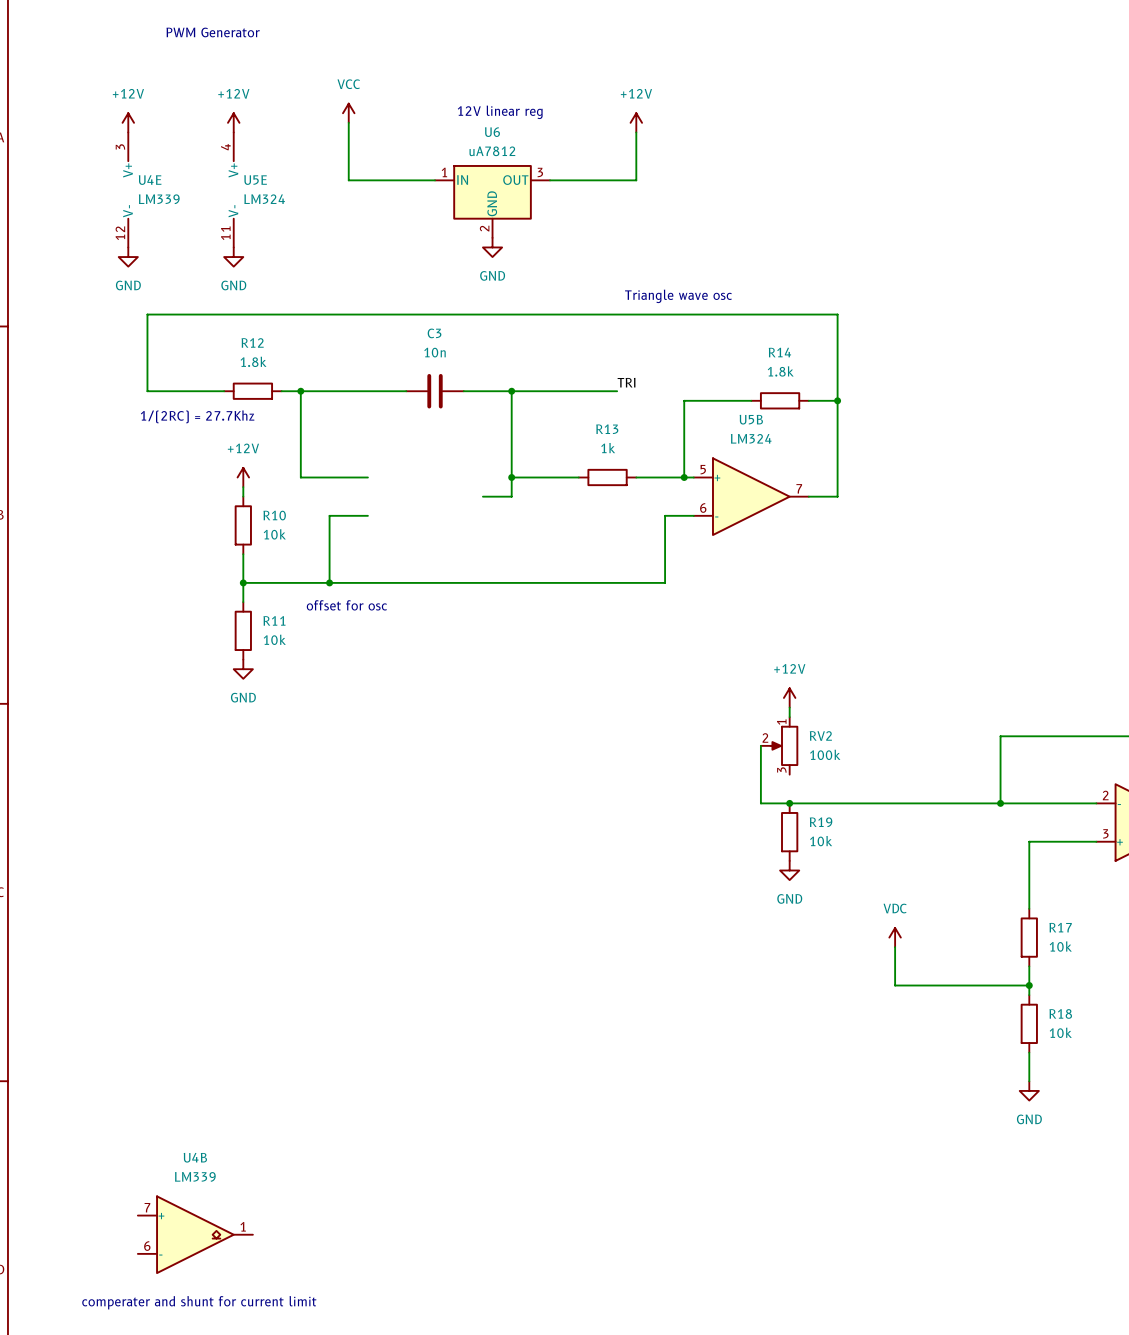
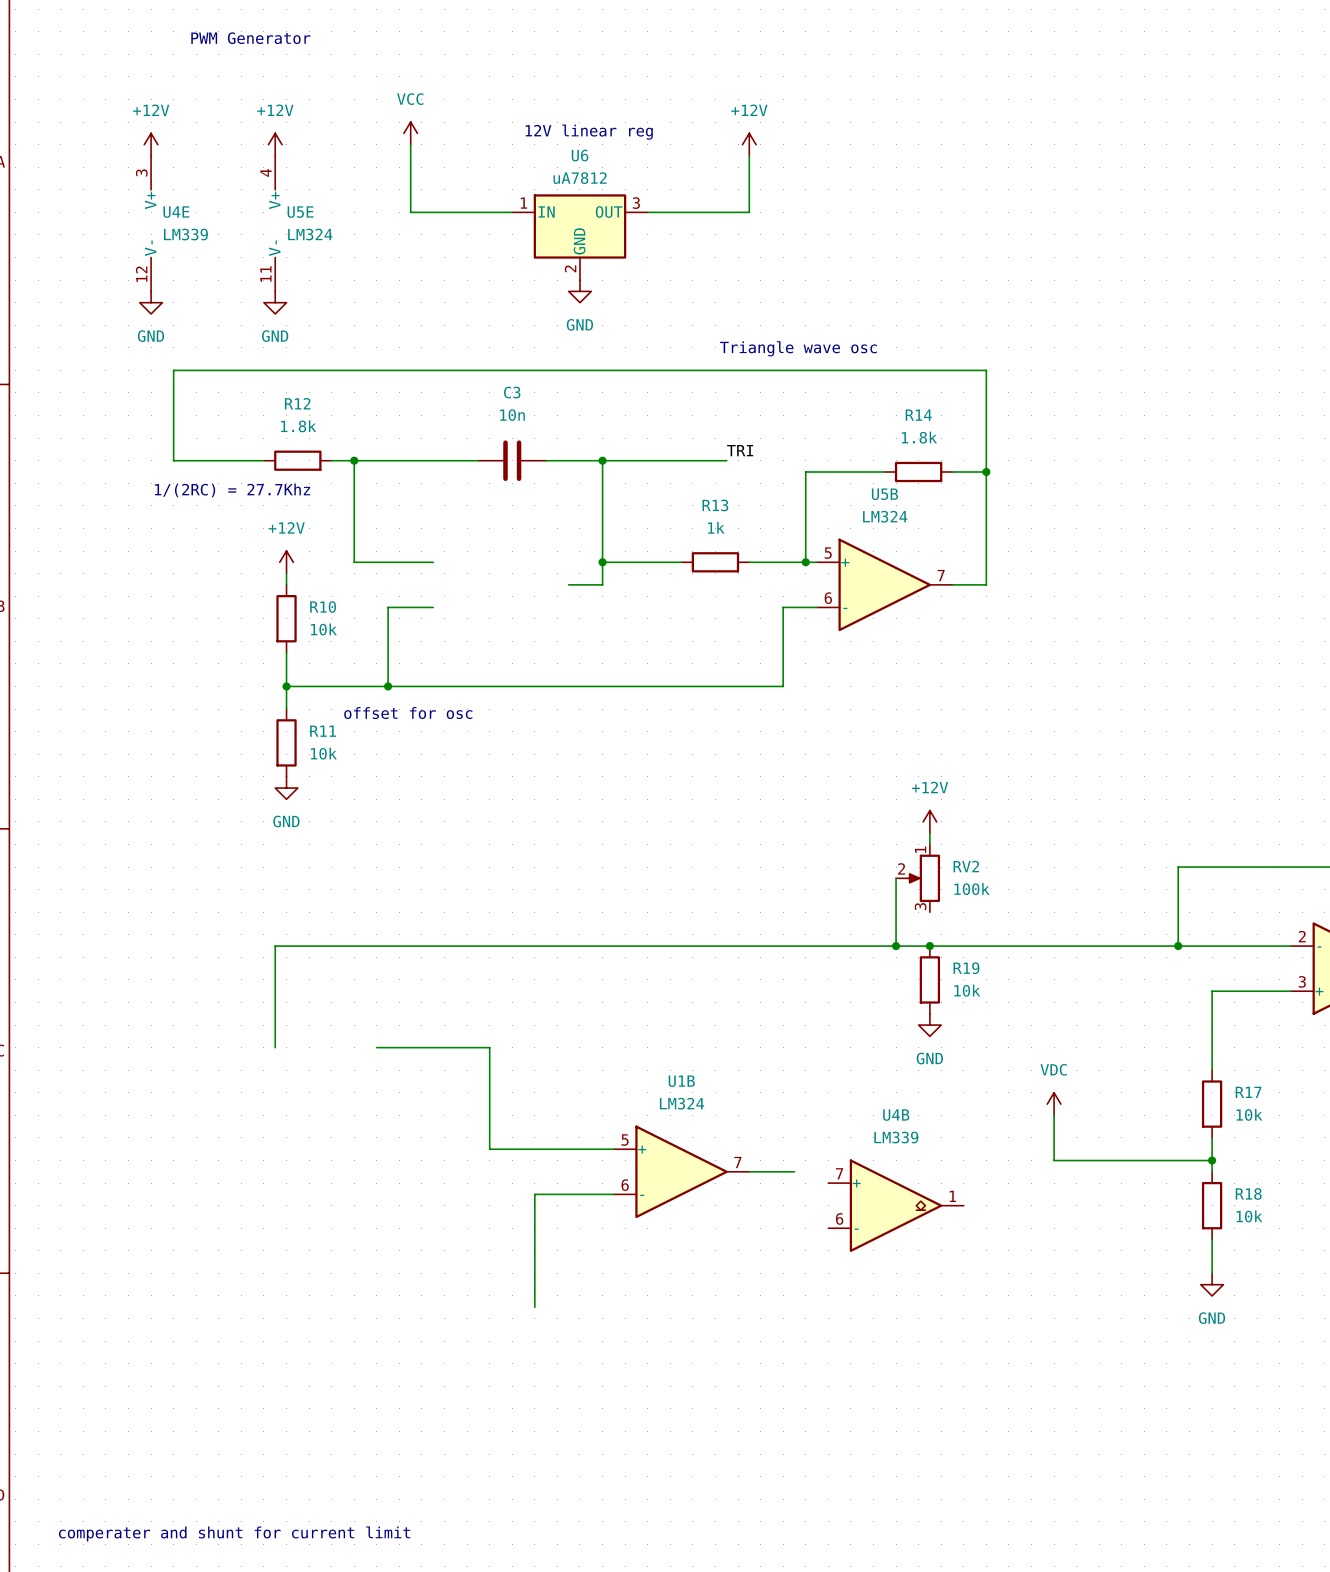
wire: none -> (896, 946) (275, 946) (275, 1047)
junction: none -> (896, 946)
wire: none -> (376, 1047) (489, 1047) (489, 1149) (613, 1149)
U1B: none -> LM324 (681, 1171)
wire: none -> (749, 1171) (794, 1171)
wire: none -> (613, 1194) (534, 1194) (534, 1307)
U4B position: (195, 1234) -> (896, 1205)

